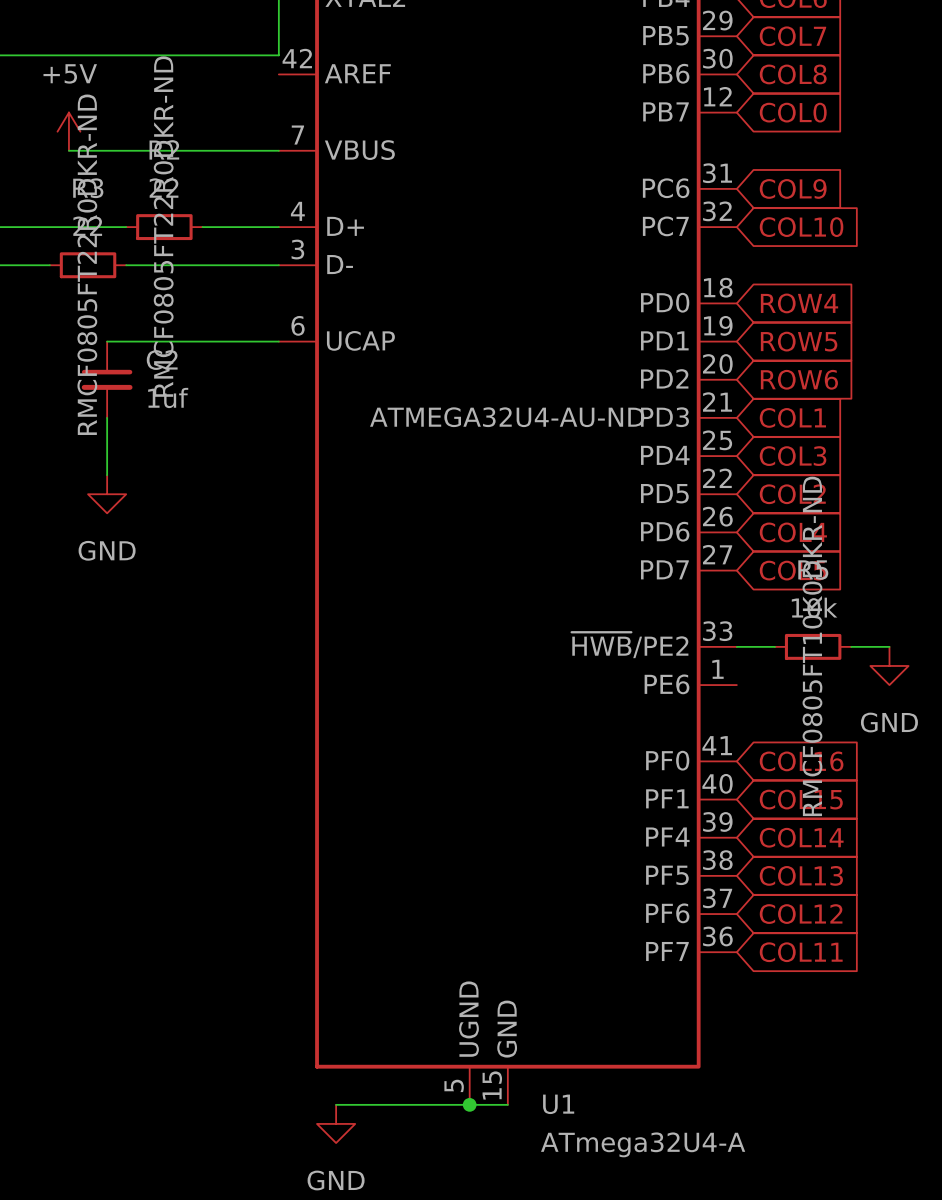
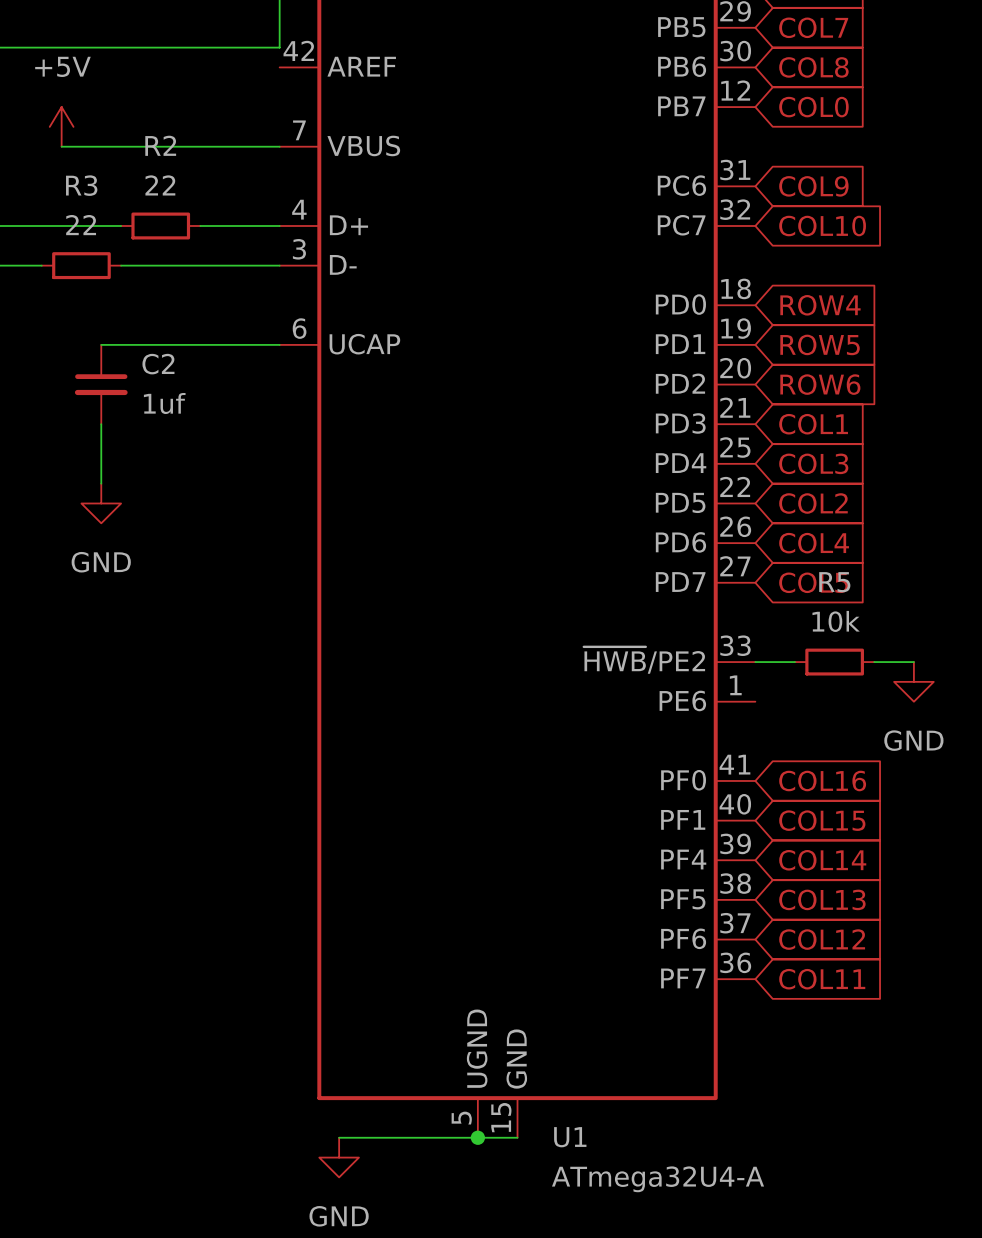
R2 text: RMCF0805FT22R0DKR-ND (163, 226) -> none
R3 text: RMCF0805FT22R0DKR-ND (87, 264) -> none
U1 text: ATMEGA32U4-AU-ND (507, 417) -> none
R5 text: RMCF0805FT10K0DKR-ND (812, 646) -> none

